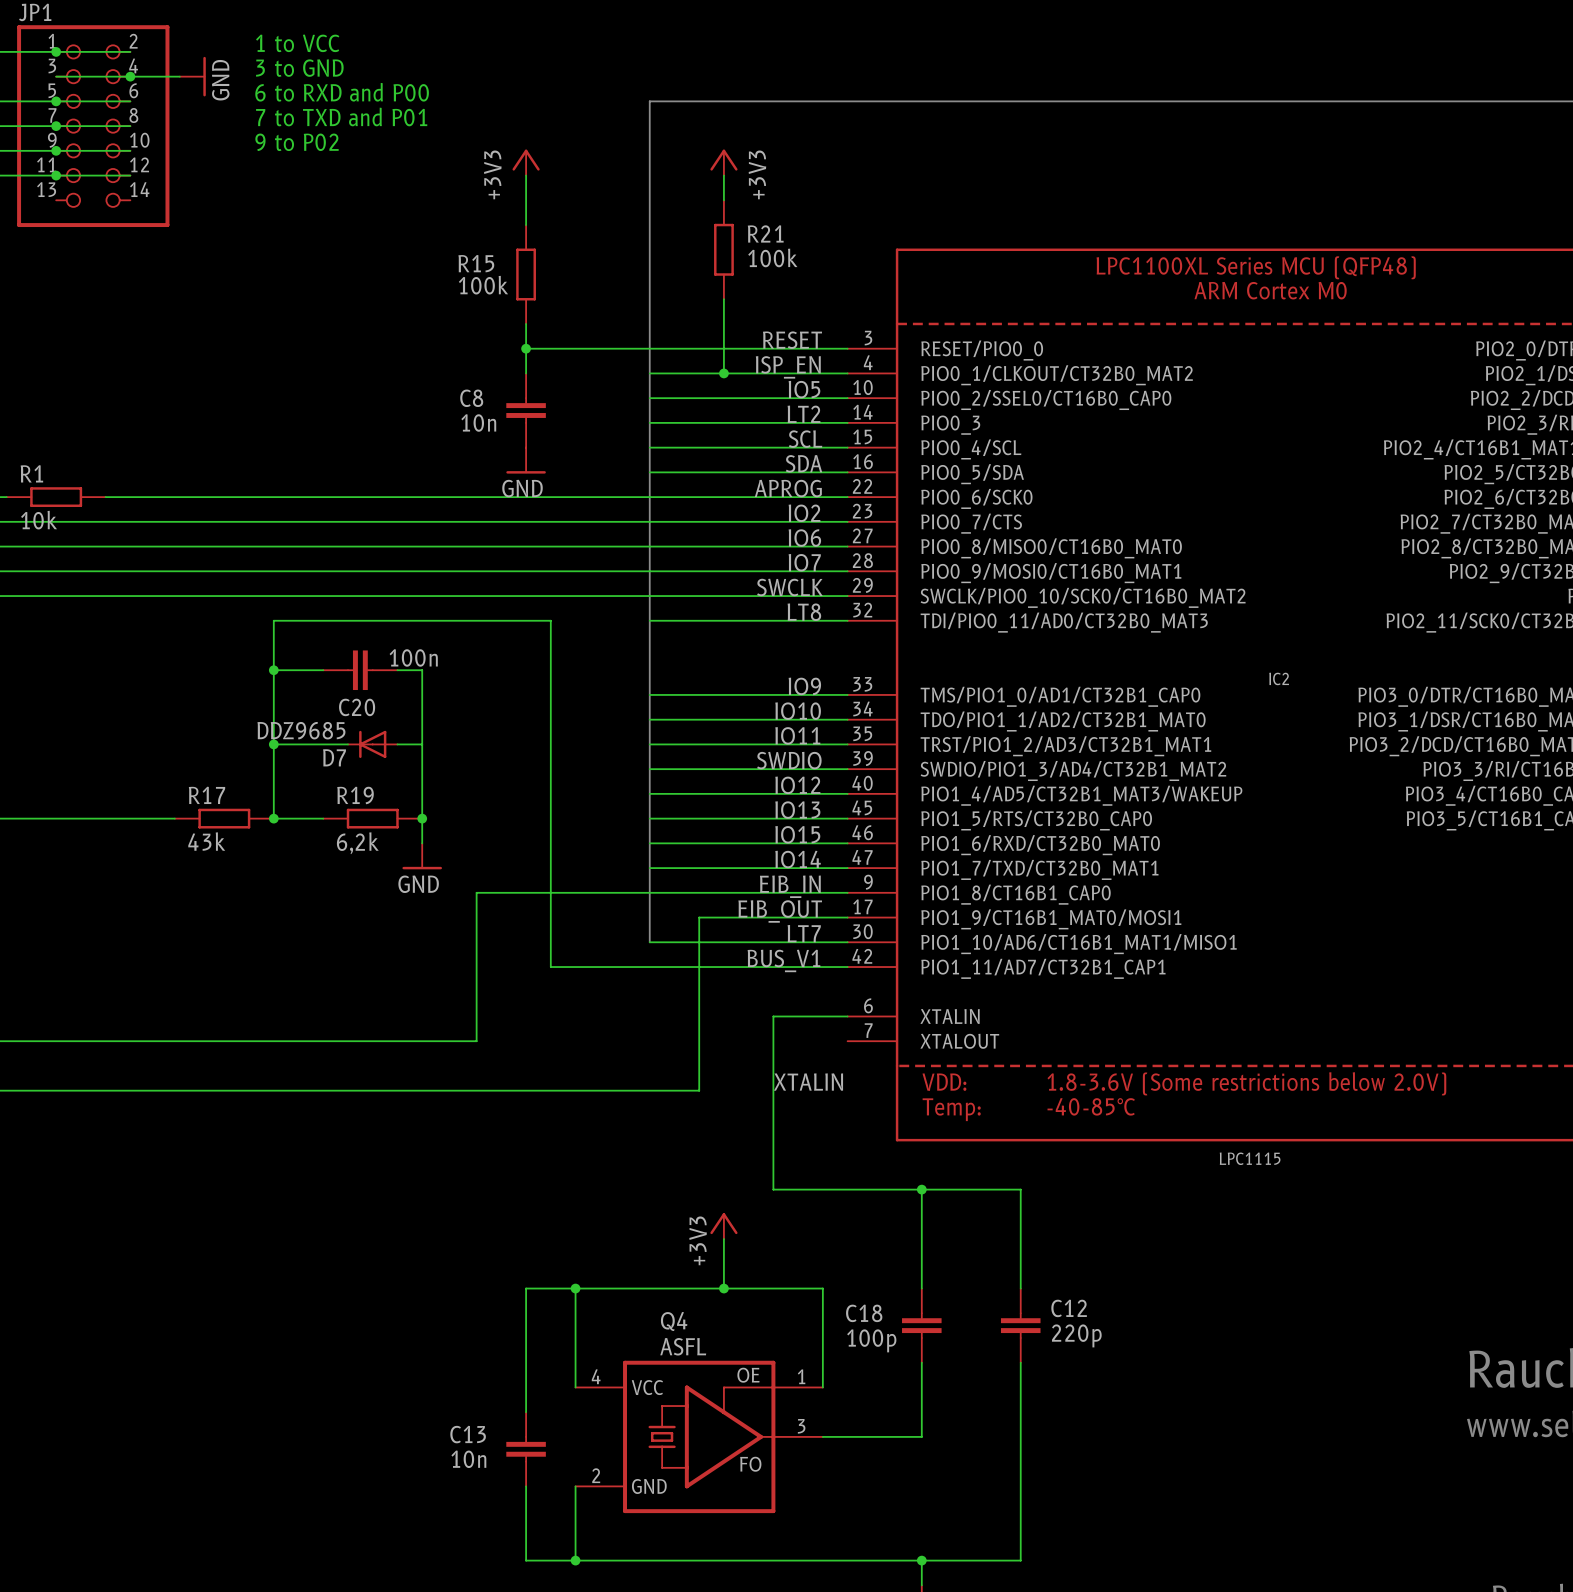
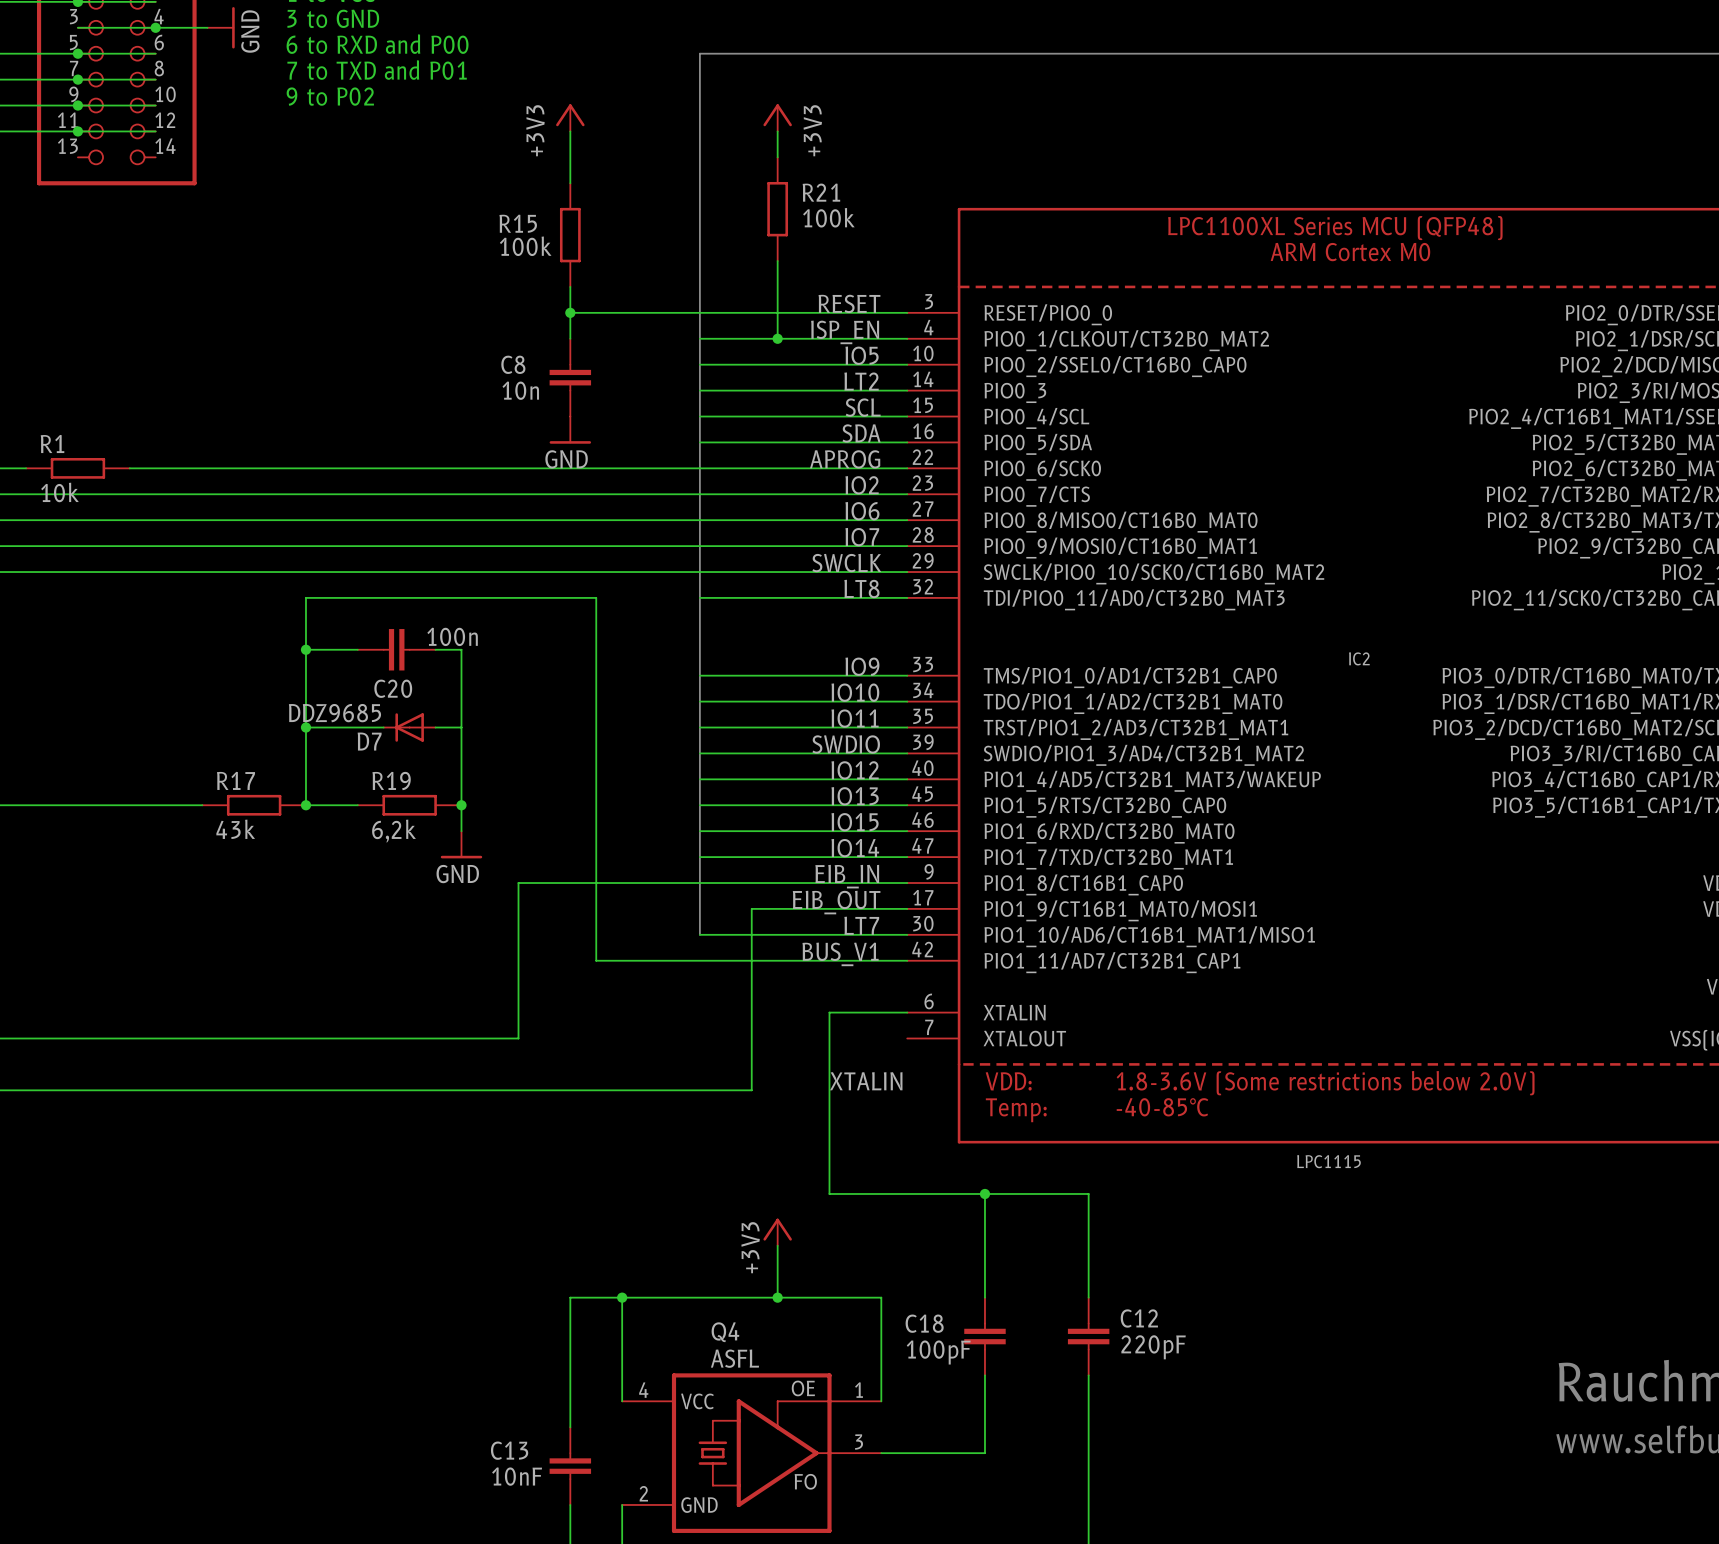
C12 value: 220p (1076, 1335) -> 220pF (1153, 1347)
C18 value: 100p (871, 1340) -> 100pF (938, 1352)
C13 value: 10n (468, 1459) -> 10nF (517, 1476)

